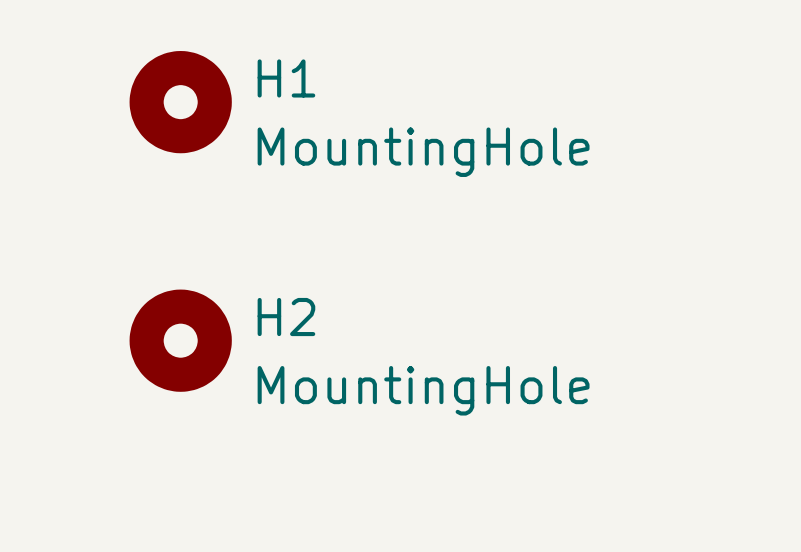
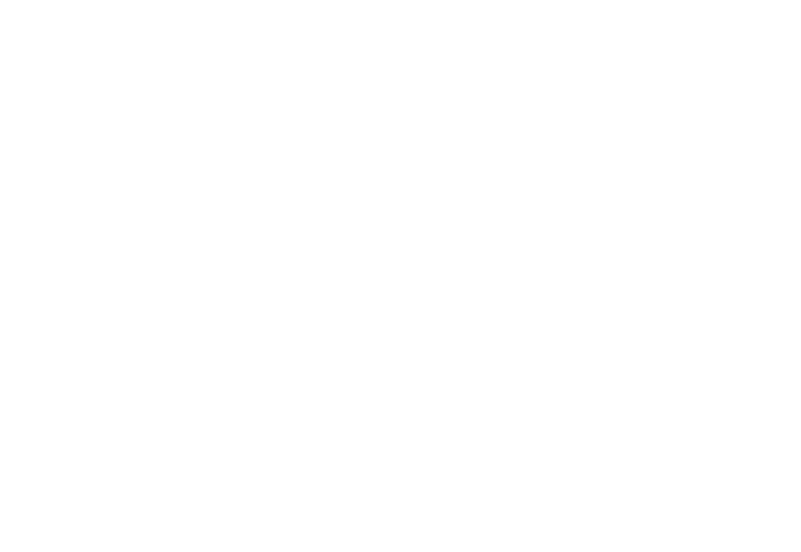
H1: MountingHole (180, 102) -> none
H2: MountingHole (180, 340) -> none

